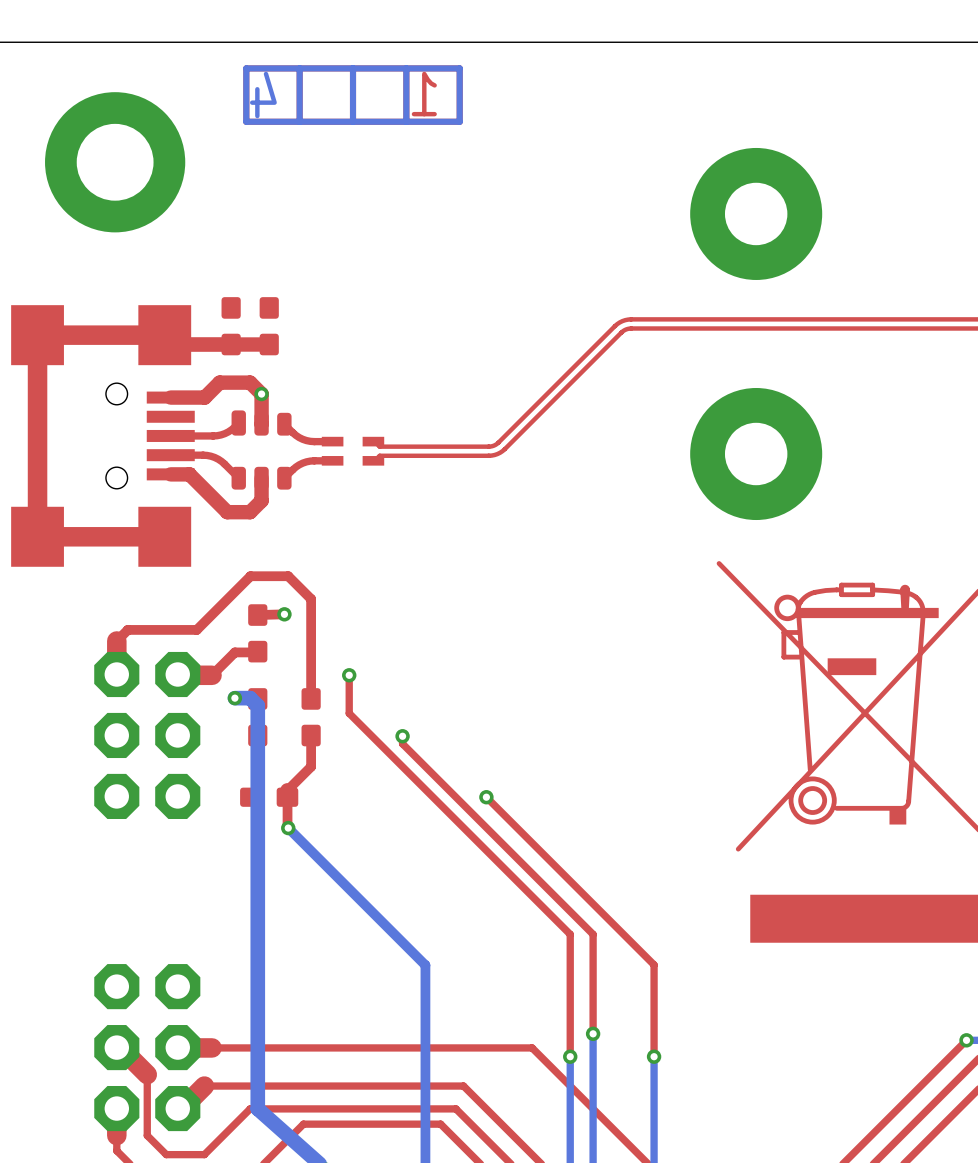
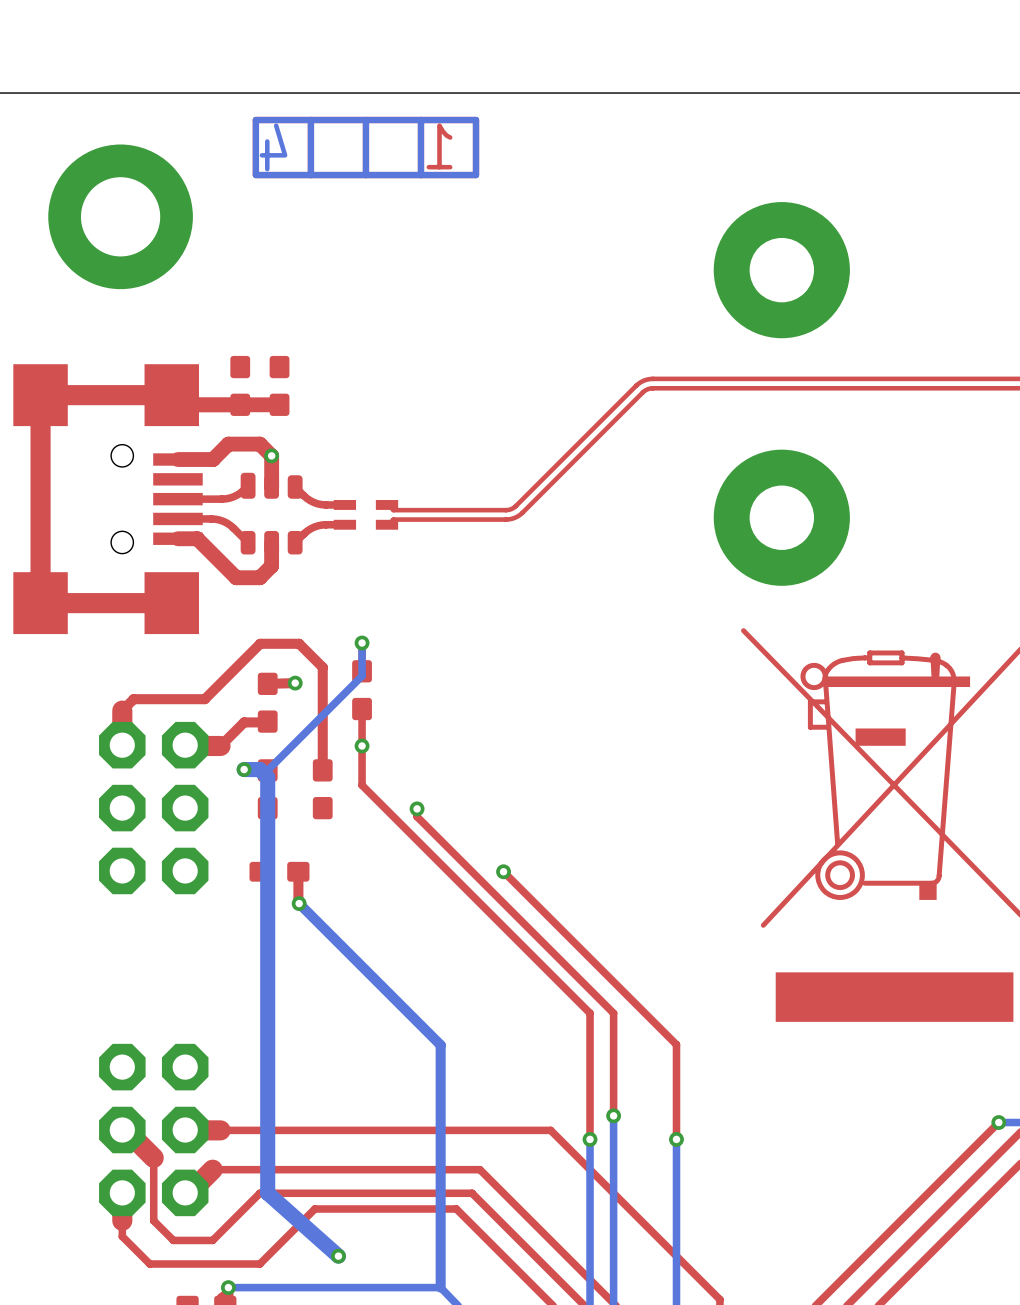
bottom track: none -> (362, 642) (362, 676) (267, 770) (244, 769)
via: none -> (362, 642)
part: none -> (362, 690)
top track: none -> (362, 709) (362, 745)
top track: (311, 735) (311, 766) (287, 790) (287, 797) -> none

